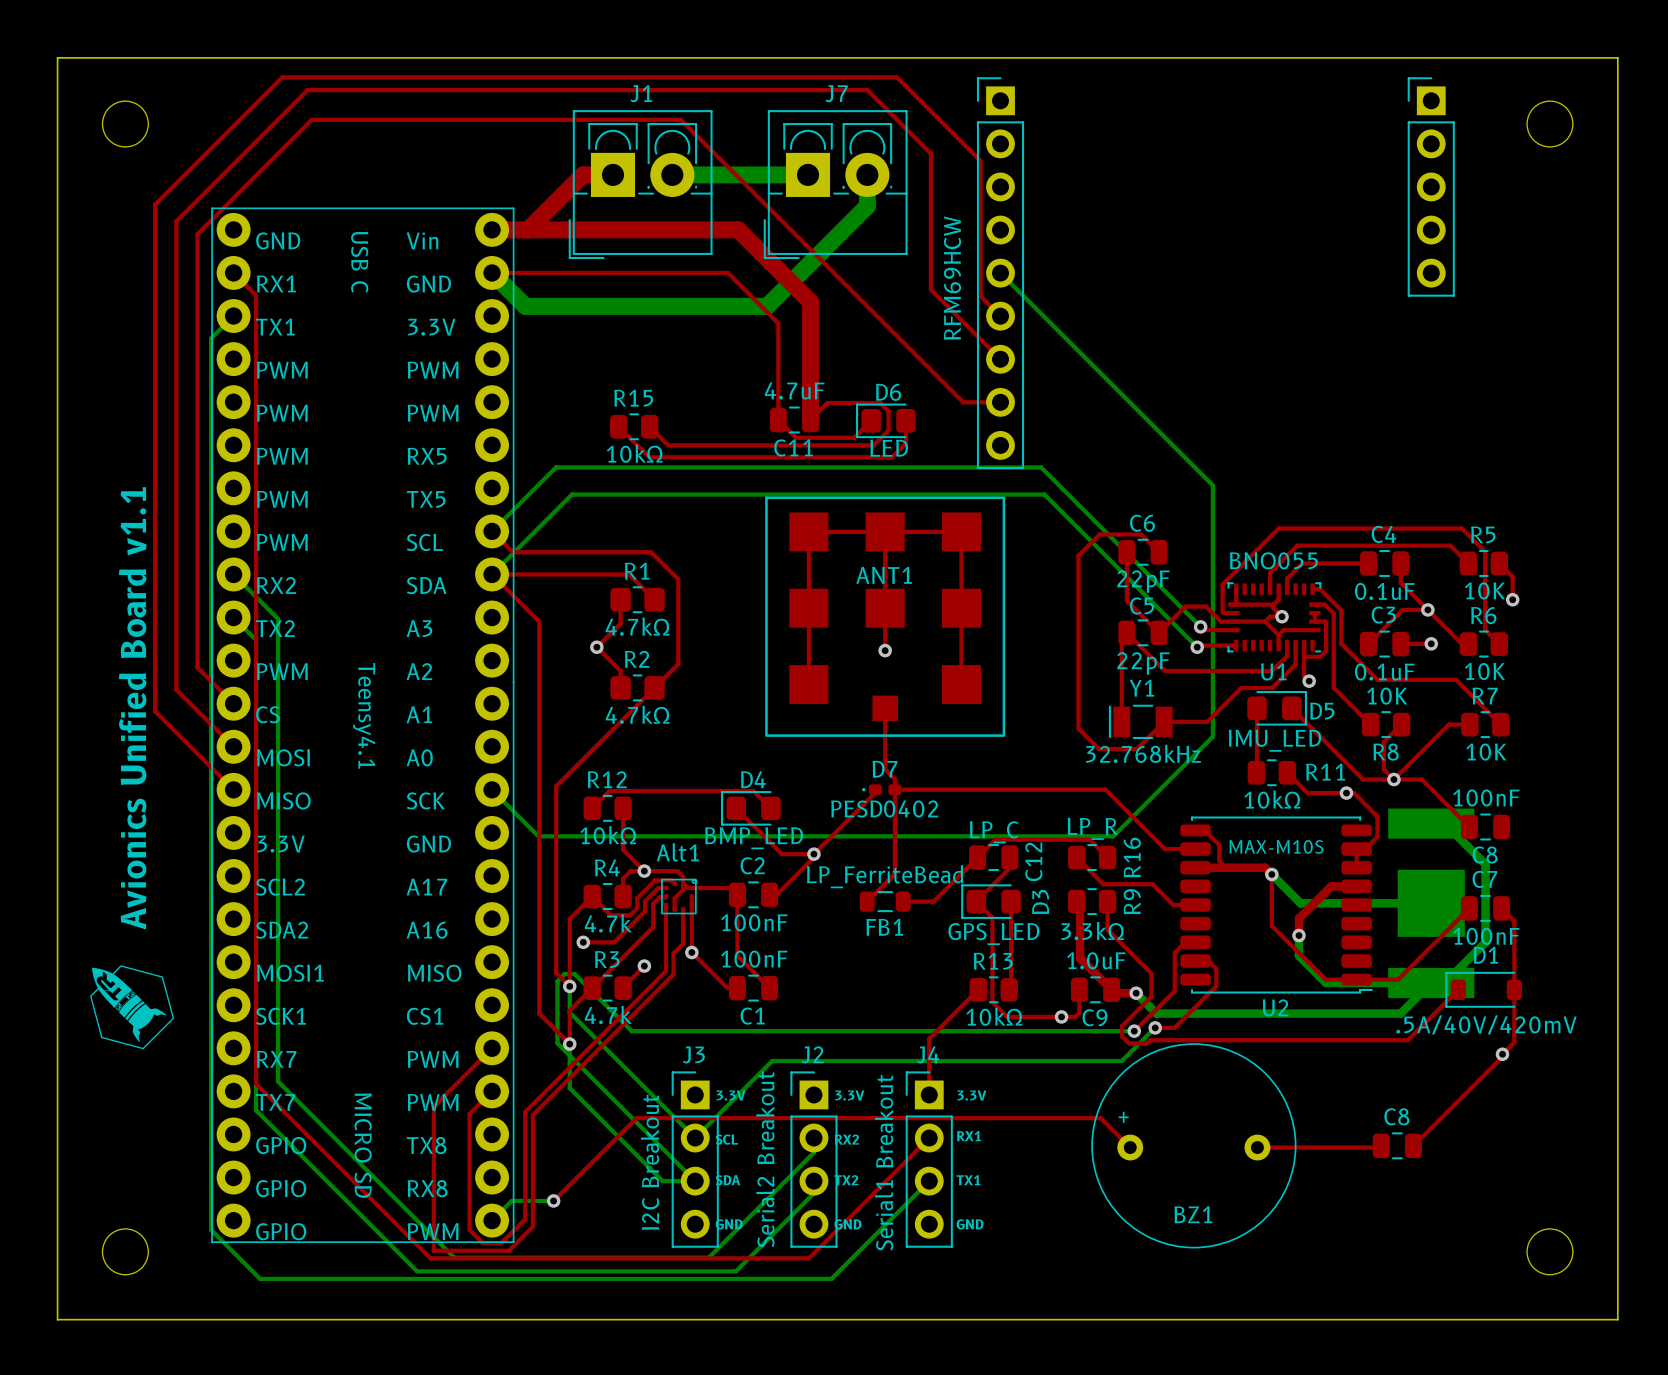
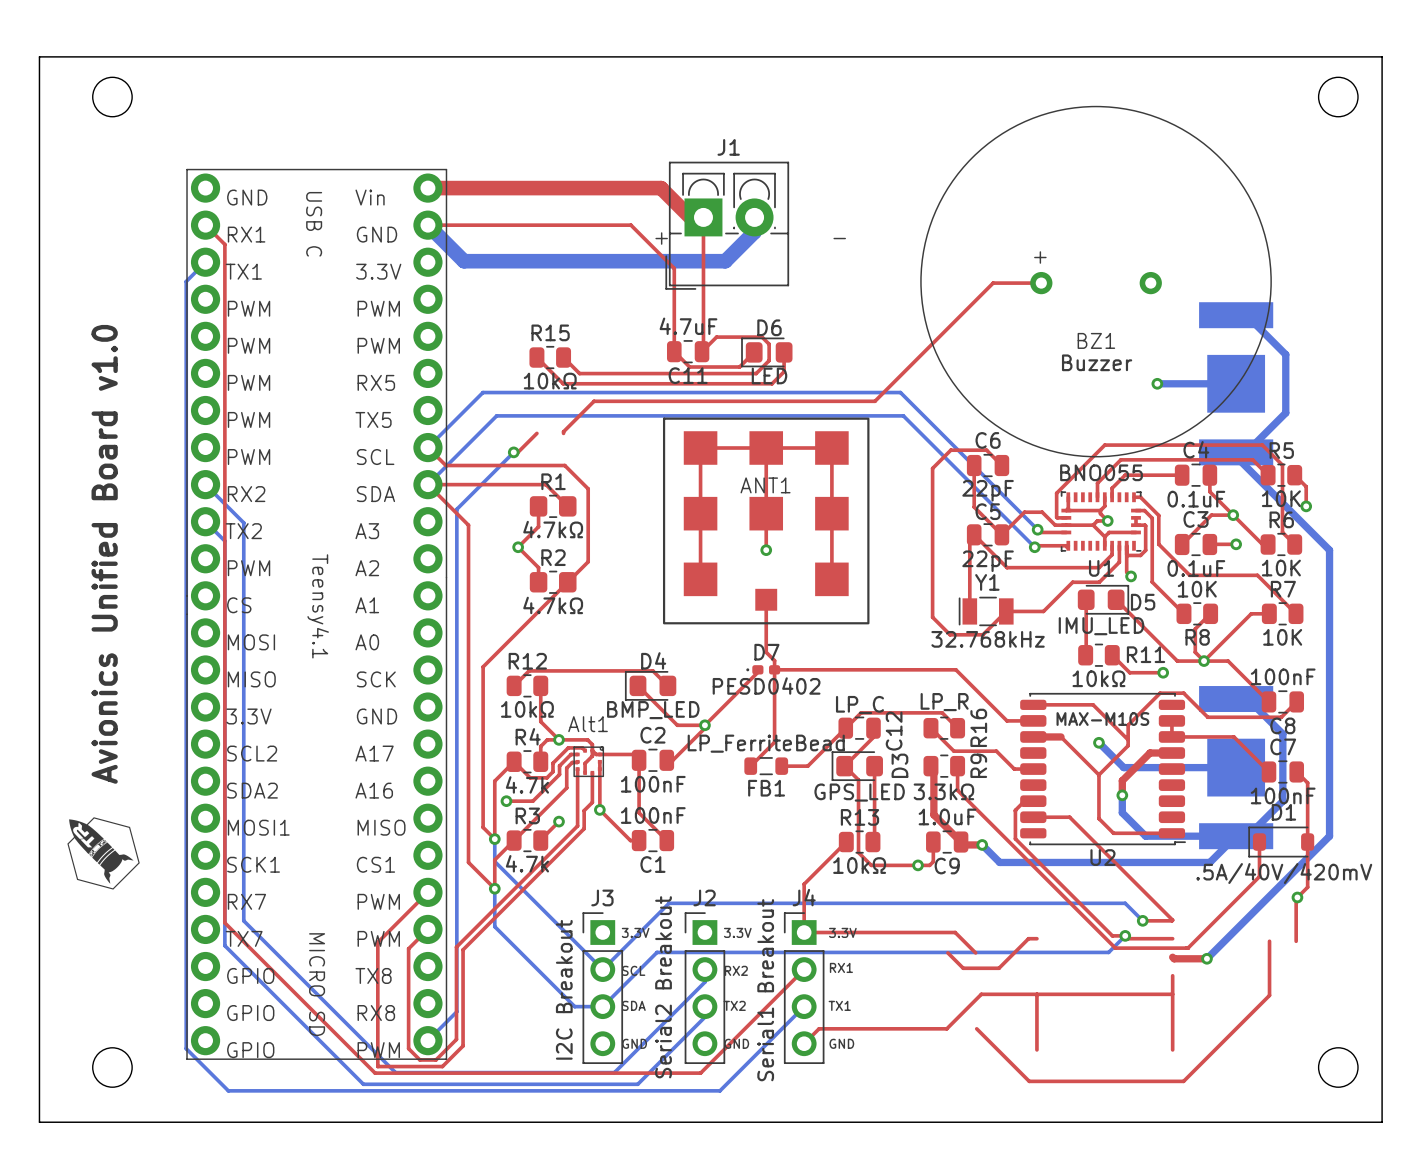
board edge: (57, 57) (1617, 57) (1617, 1319) (57, 1319) (57, 57) -> (39, 56) (39, 1122) (1382, 1122) (1382, 56) (39, 56)
top track: (612, 174) (582, 174) (528, 229) -> none
bottom track: (672, 174) (808, 174) -> none
bottom track: (867, 174) (867, 206) (767, 306) (525, 306) -> (754, 217) (754, 232) (725, 261) (463, 261) (456, 253)
J1 position: (640, 184) -> (727, 225)
J7: (835, 184) -> none
part: (1431, 186) -> none
top track: (738, 229) (810, 302) (810, 419) -> (639, 188) (661, 188) (690, 217) (703, 217) (703, 350)
bottom track: (1000, 273) (1212, 485) (1212, 736) (1113, 836) (538, 836) (492, 789) -> none
part: RFM69HCW (1000, 273) -> none
top track: (1000, 316) (980, 296) (980, 160) (897, 77) (282, 77) (155, 204) (155, 711) (233, 789) -> none
top track: none -> (1041, 283) (993, 283) (874, 401) (594, 401) (563, 433)
top track: (1000, 359) (930, 289) (930, 153) (867, 90) (307, 90) (176, 221) (176, 689) (233, 746) -> none
bottom track: none -> (1211, 315) (1246, 315) (1285, 354) (1285, 412) (1246, 452) (1211, 452)
top track: (1000, 402) (963, 402) (680, 119) (311, 119) (197, 234) (197, 667) (233, 703) -> none
BZ1 value: none -> Buzzer (1097, 362)
bottom track: none -> (1157, 383) (1224, 383)
via: none -> (1157, 383)
part: none -> (1236, 383)
top track: none -> (536, 433) (517, 452) (513, 452)
via: none -> (513, 452)
bottom track: none -> (1236, 452) (1236, 456) (1329, 550) (1329, 836) (1206, 958)
text: Avionics Unified Board v1.1 (132, 708) -> Avionics Unified Board v1.0 (104, 554)
top track: (1346, 793) (1354, 793) (1377, 816) (1377, 836) (1365, 849) (1356, 849) -> none
top track: (1204, 830) (1219, 844) (1219, 860) (1226, 867) -> (1041, 704) (1093, 704) (1128, 739)
top track: (1227, 867) (1265, 867) (1271, 874) (1271, 911) -> (1061, 736) (1098, 774) (1128, 745) (1128, 725) (1160, 693) (1183, 693) (1207, 717) (1281, 717) (1296, 701)
top track: (1469, 908) (1398, 979) (1356, 979) -> (1268, 771) (1233, 736) (1171, 736)
top track: (1271, 925) (1325, 979) -> (1098, 786) (1098, 818) (1113, 833) (1145, 833)
top track: (1208, 960) (1216, 969) (1216, 986) (1174, 1027) (1155, 1027) -> (1044, 817) (1069, 817) (1172, 920) (1142, 920)
top track: (1151, 973) (1151, 996) (1121, 1026) (1121, 1036) (1129, 1043) (1146, 1043) (1150, 1040) (1408, 1040) (1458, 989) -> (995, 828) (1115, 948) (1188, 948)
top track: (1174, 986) (1174, 991) (1134, 1031) -> (1015, 838) (1112, 935) (1125, 935) (1128, 938) (1172, 938)
top track: none -> (1259, 842) (1259, 876) (1188, 948)
drawing position: (132, 1007) -> (103, 853)
bottom track: (1154, 1027) (1121, 1061) -> (1142, 920) (1125, 903) (969, 903)
via: (1155, 1027) -> none
bottom track: (1134, 1031) (631, 1031) (574, 974) (564, 974) (557, 981) (557, 1043) (695, 1181) -> (1125, 935) (1108, 952) (656, 952) (602, 1006)
via: (1134, 1031) -> none
BZ1 footprint: [1091, 1043, 1297, 1249] -> [920, 105, 1272, 458]
top track: (1502, 1054) (1502, 1056) (1413, 1145) -> none
top track: none -> (1296, 898) (1296, 941)
via: none -> (1142, 920)
top track: none -> (804, 932) (955, 932) (975, 952)
via: none -> (1125, 935)
top track: none -> (1036, 938) (1028, 938) (999, 968) (963, 968) (947, 952)
top track: none -> (1269, 941) (1269, 995) (1183, 1081) (1029, 1081) (976, 1028)
top track: none -> (1172, 957) (1206, 958)
via: none -> (1206, 958)
top track: none -> (1172, 975) (1172, 1049)
top track: (1381, 1145) (1379, 1147) (1257, 1147) -> none
C8: (1397, 1145) -> none
top track: (1130, 1147) (1100, 1118) (636, 1118) (553, 1200) -> none
top track: none -> (1036, 994) (1036, 1049)
top track: none -> (1172, 994) (981, 994) (946, 1028) (819, 1028) (804, 1043)
bottom track: (511, 1200) (553, 1200) -> (444, 1023) (456, 1011) (456, 509) (513, 452)
via: (553, 1200) -> none

